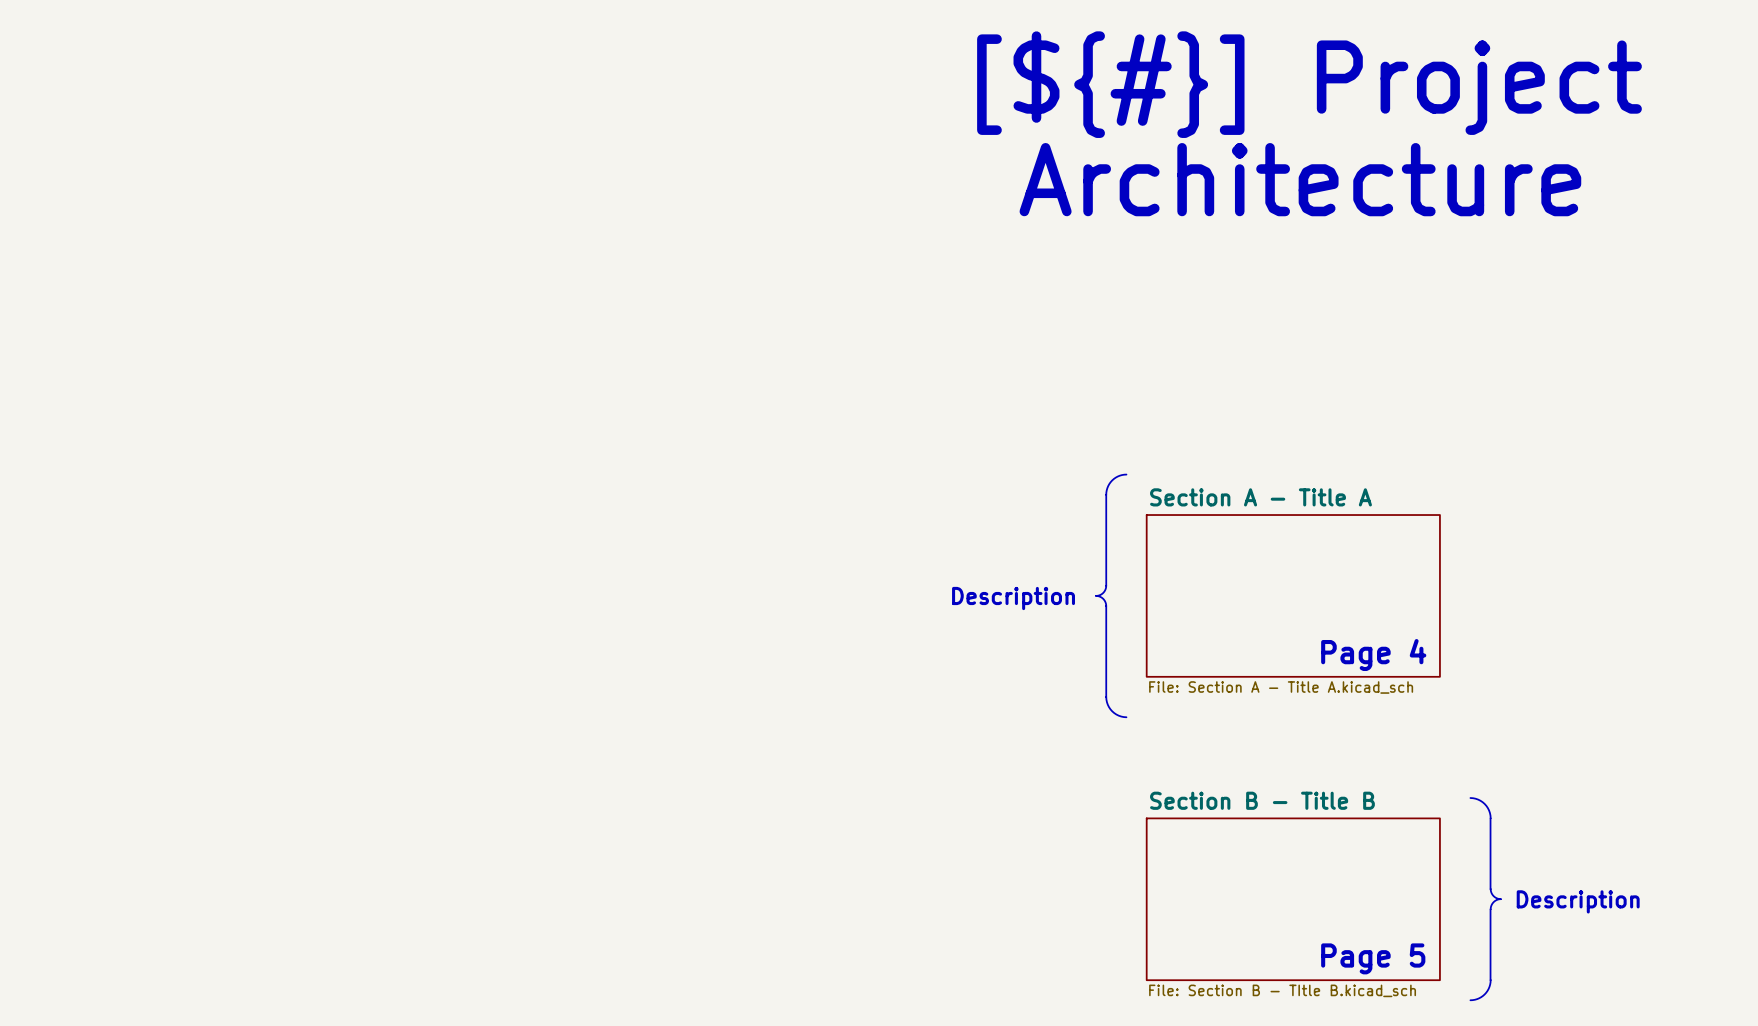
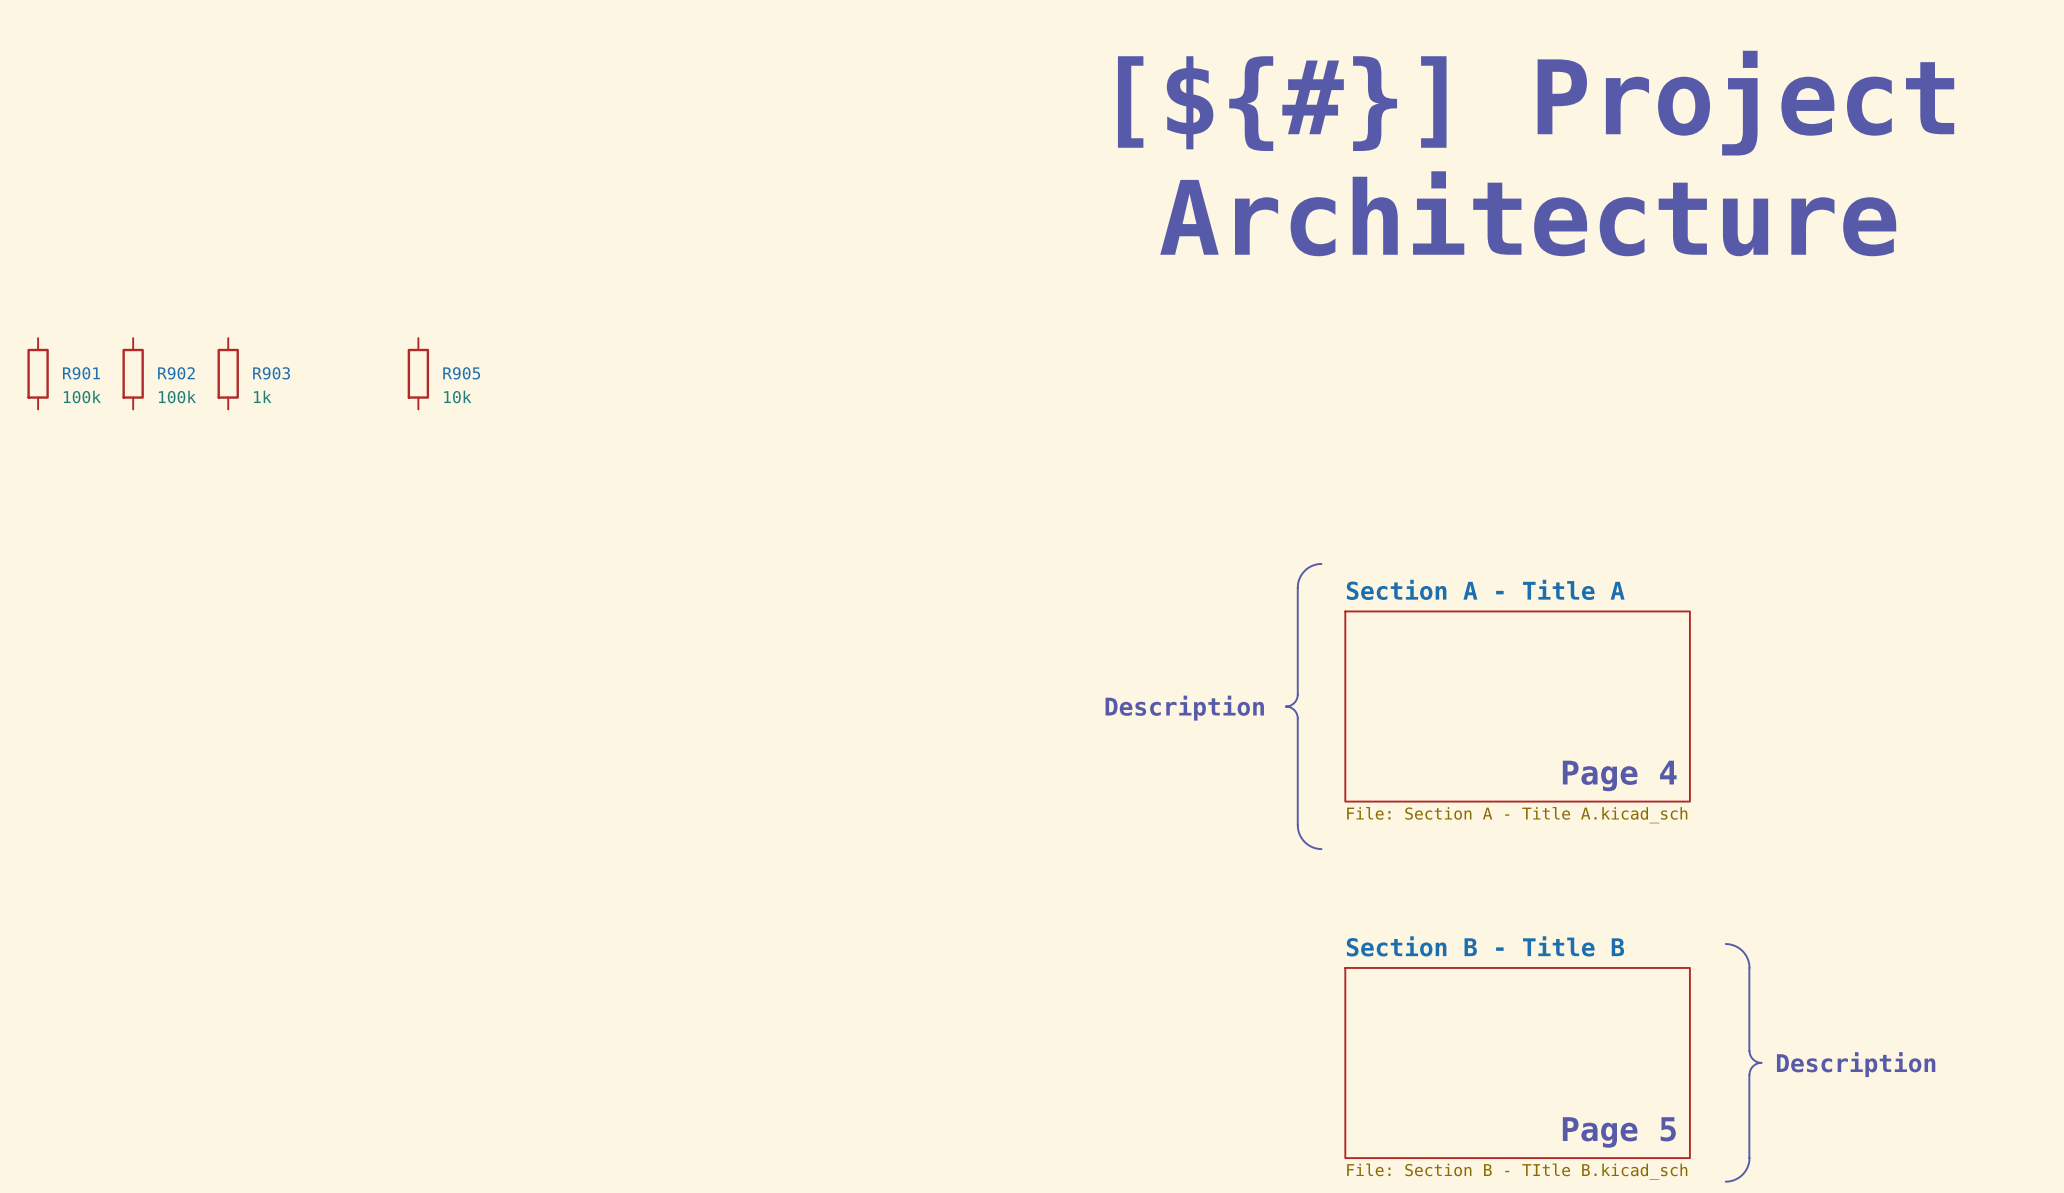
R901: none -> 100k (38, 373)
R902: none -> 100k (133, 373)
R903: none -> 1k (228, 373)
R905: none -> 10k (418, 373)

